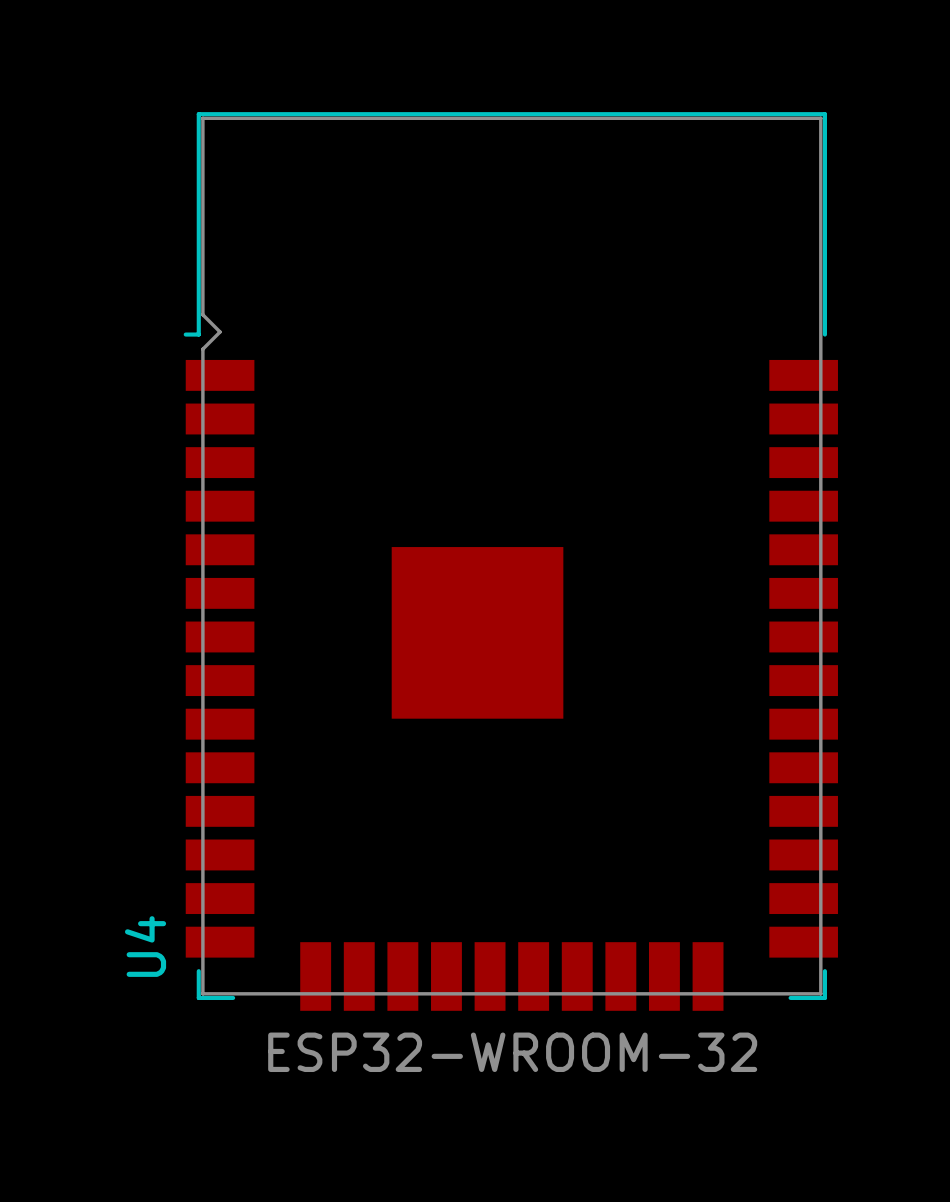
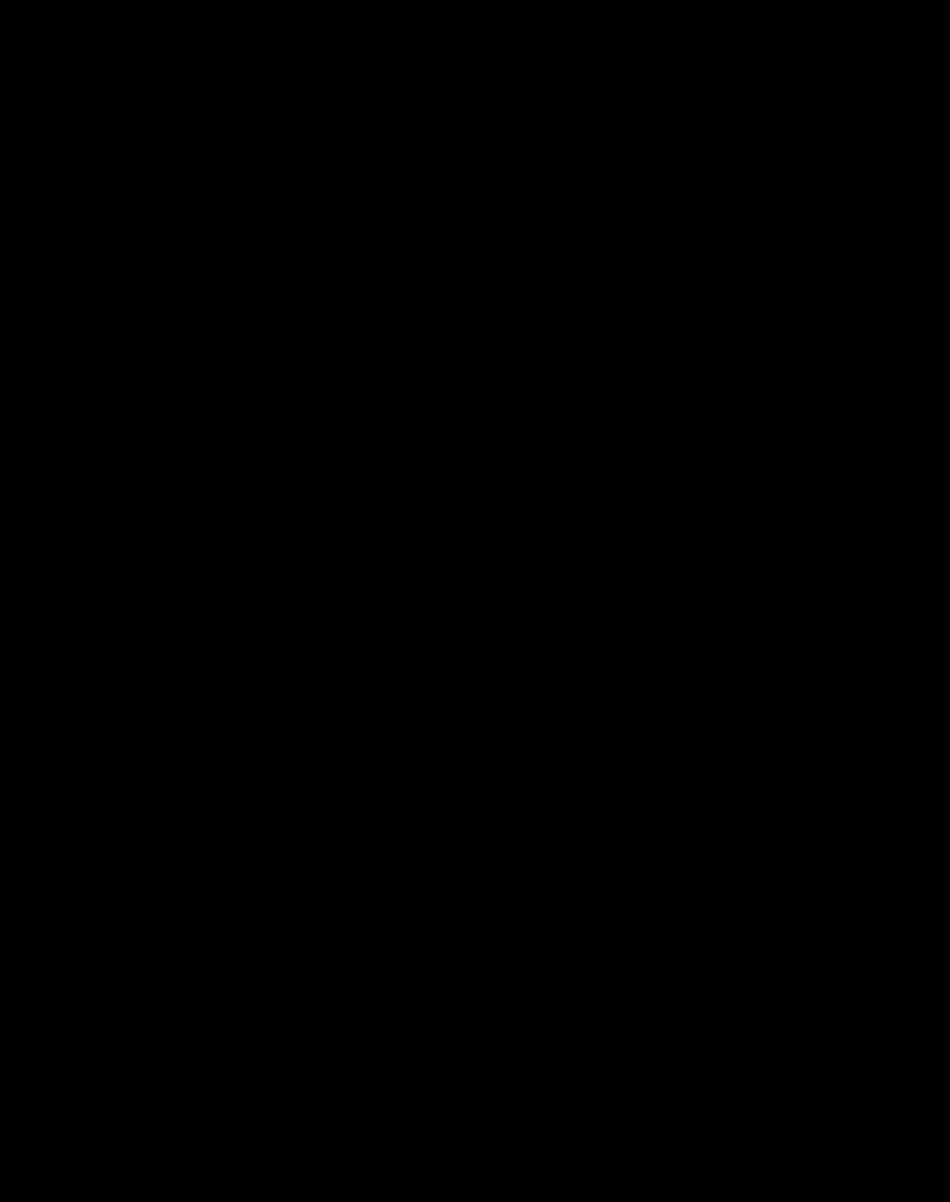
U4: ESP32-WROOM-32 (510, 561) -> none

